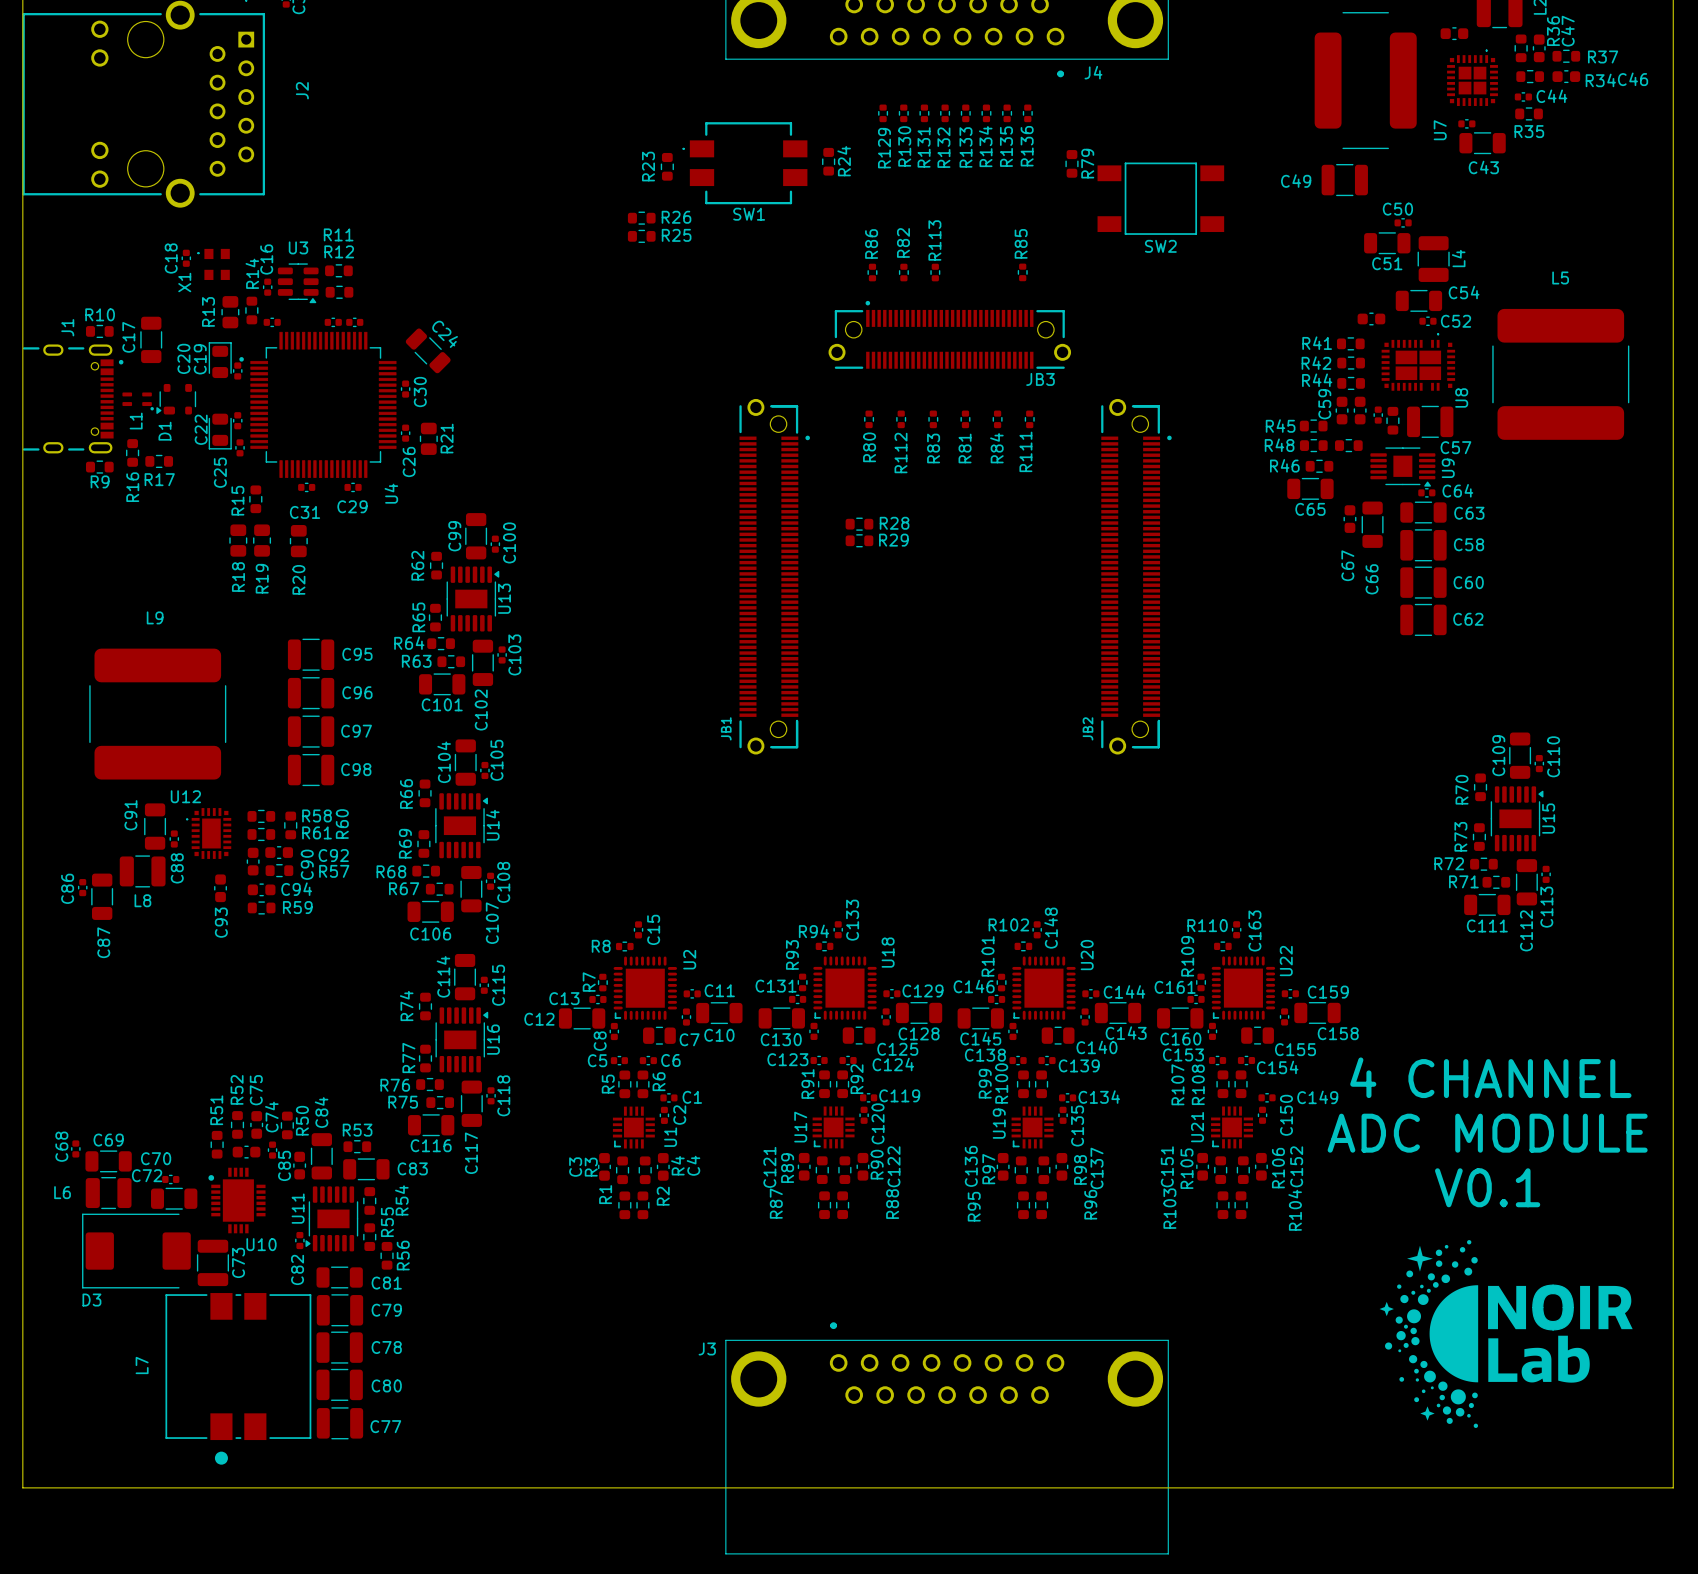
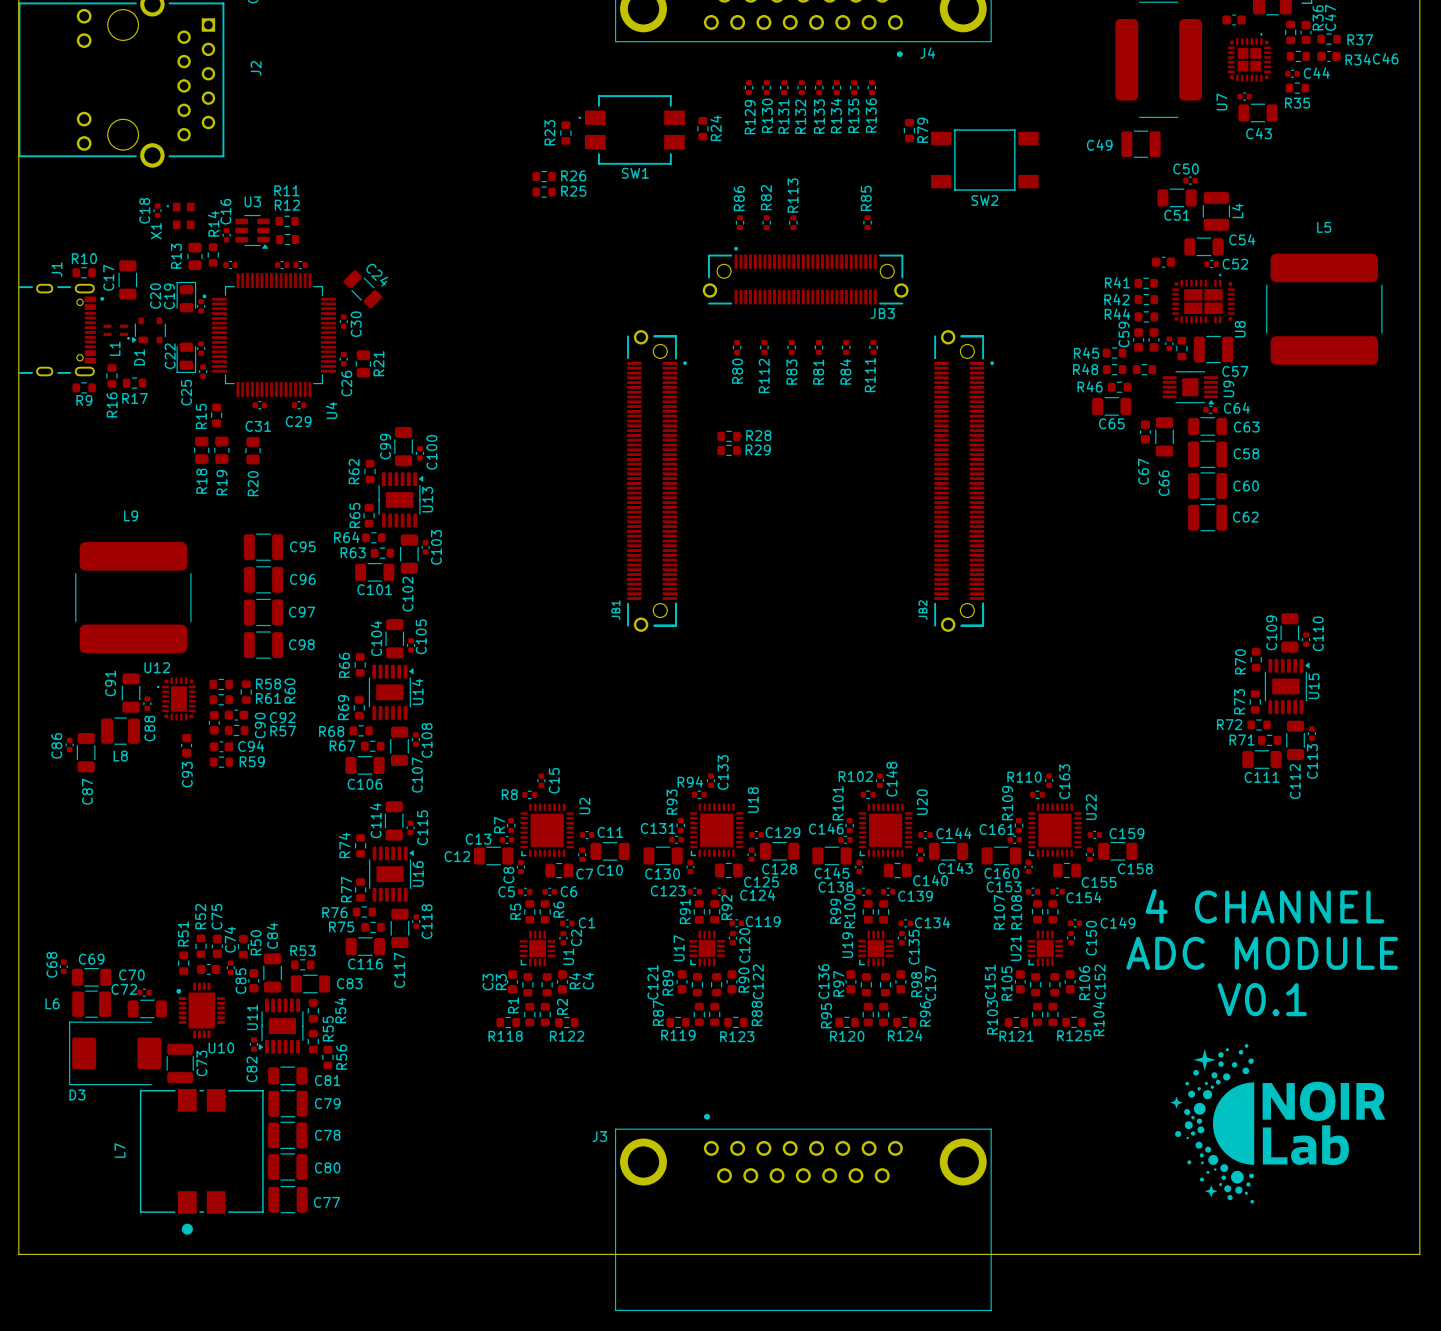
R118: none -> (508, 1022)
R122: none -> (566, 1022)
R119: none -> (678, 1022)
R123: none -> (735, 1022)
R120: none -> (847, 1022)
R124: none -> (904, 1022)
R121: none -> (1016, 1022)
R125: none -> (1074, 1022)

